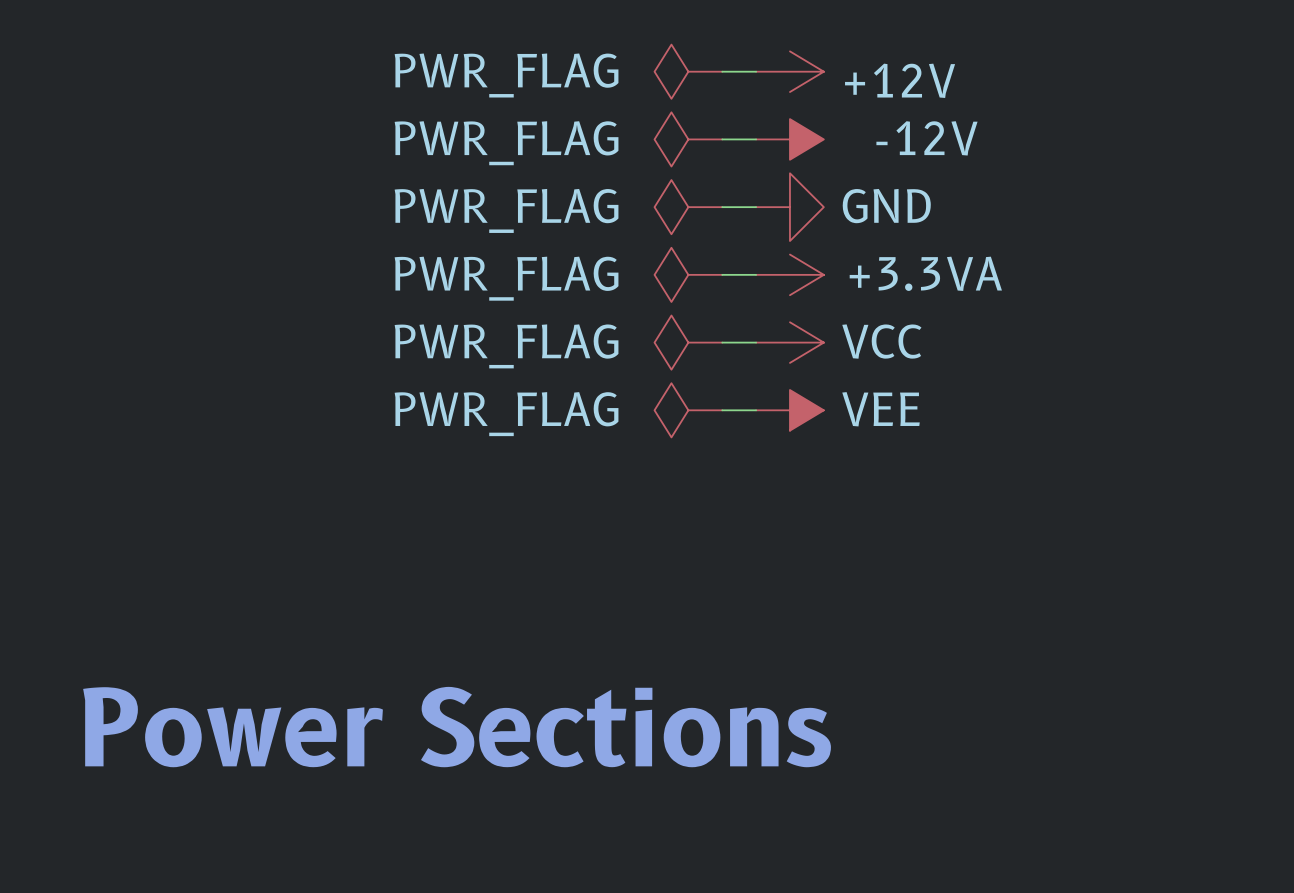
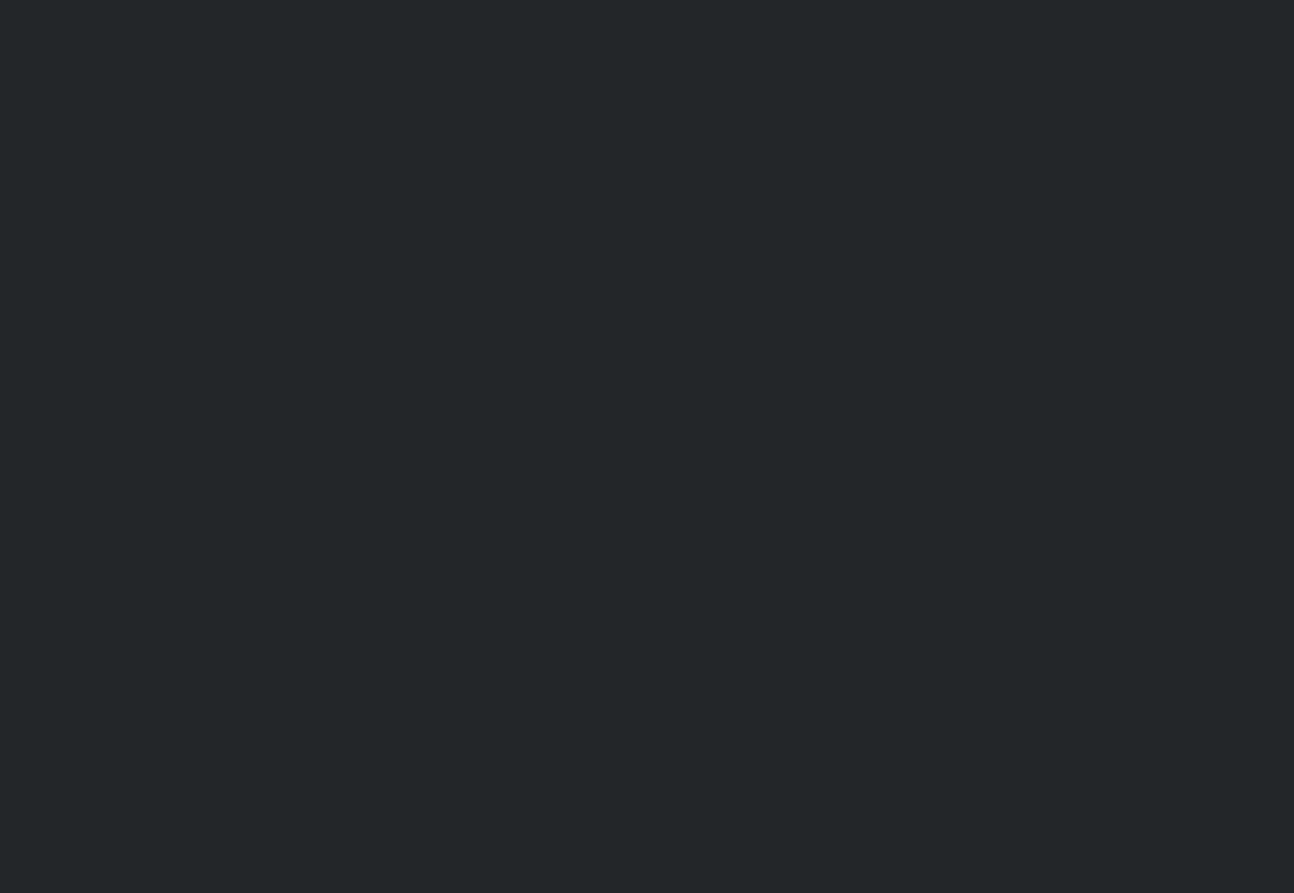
power symbol: PWR_FLAG (688, 71) -> none
wire: (722, 71) (756, 71) -> none
power symbol: +12V (789, 71) -> none
power symbol: PWR_FLAG (688, 139) -> none
wire: (722, 139) (756, 139) -> none
power symbol: -12V (789, 139) -> none
power symbol: PWR_FLAG (688, 207) -> none
wire: (722, 207) (756, 207) -> none
power symbol: GND (789, 207) -> none
power symbol: PWR_FLAG (688, 274) -> none
wire: (722, 274) (756, 274) -> none
power symbol: +3.3VA (789, 274) -> none
power symbol: PWR_FLAG (688, 342) -> none
wire: (722, 342) (756, 342) -> none
power symbol: VCC (789, 342) -> none
power symbol: PWR_FLAG (688, 410) -> none
wire: (722, 410) (756, 410) -> none
power symbol: VEE (789, 410) -> none
text: Power Sections (457, 727) -> none

